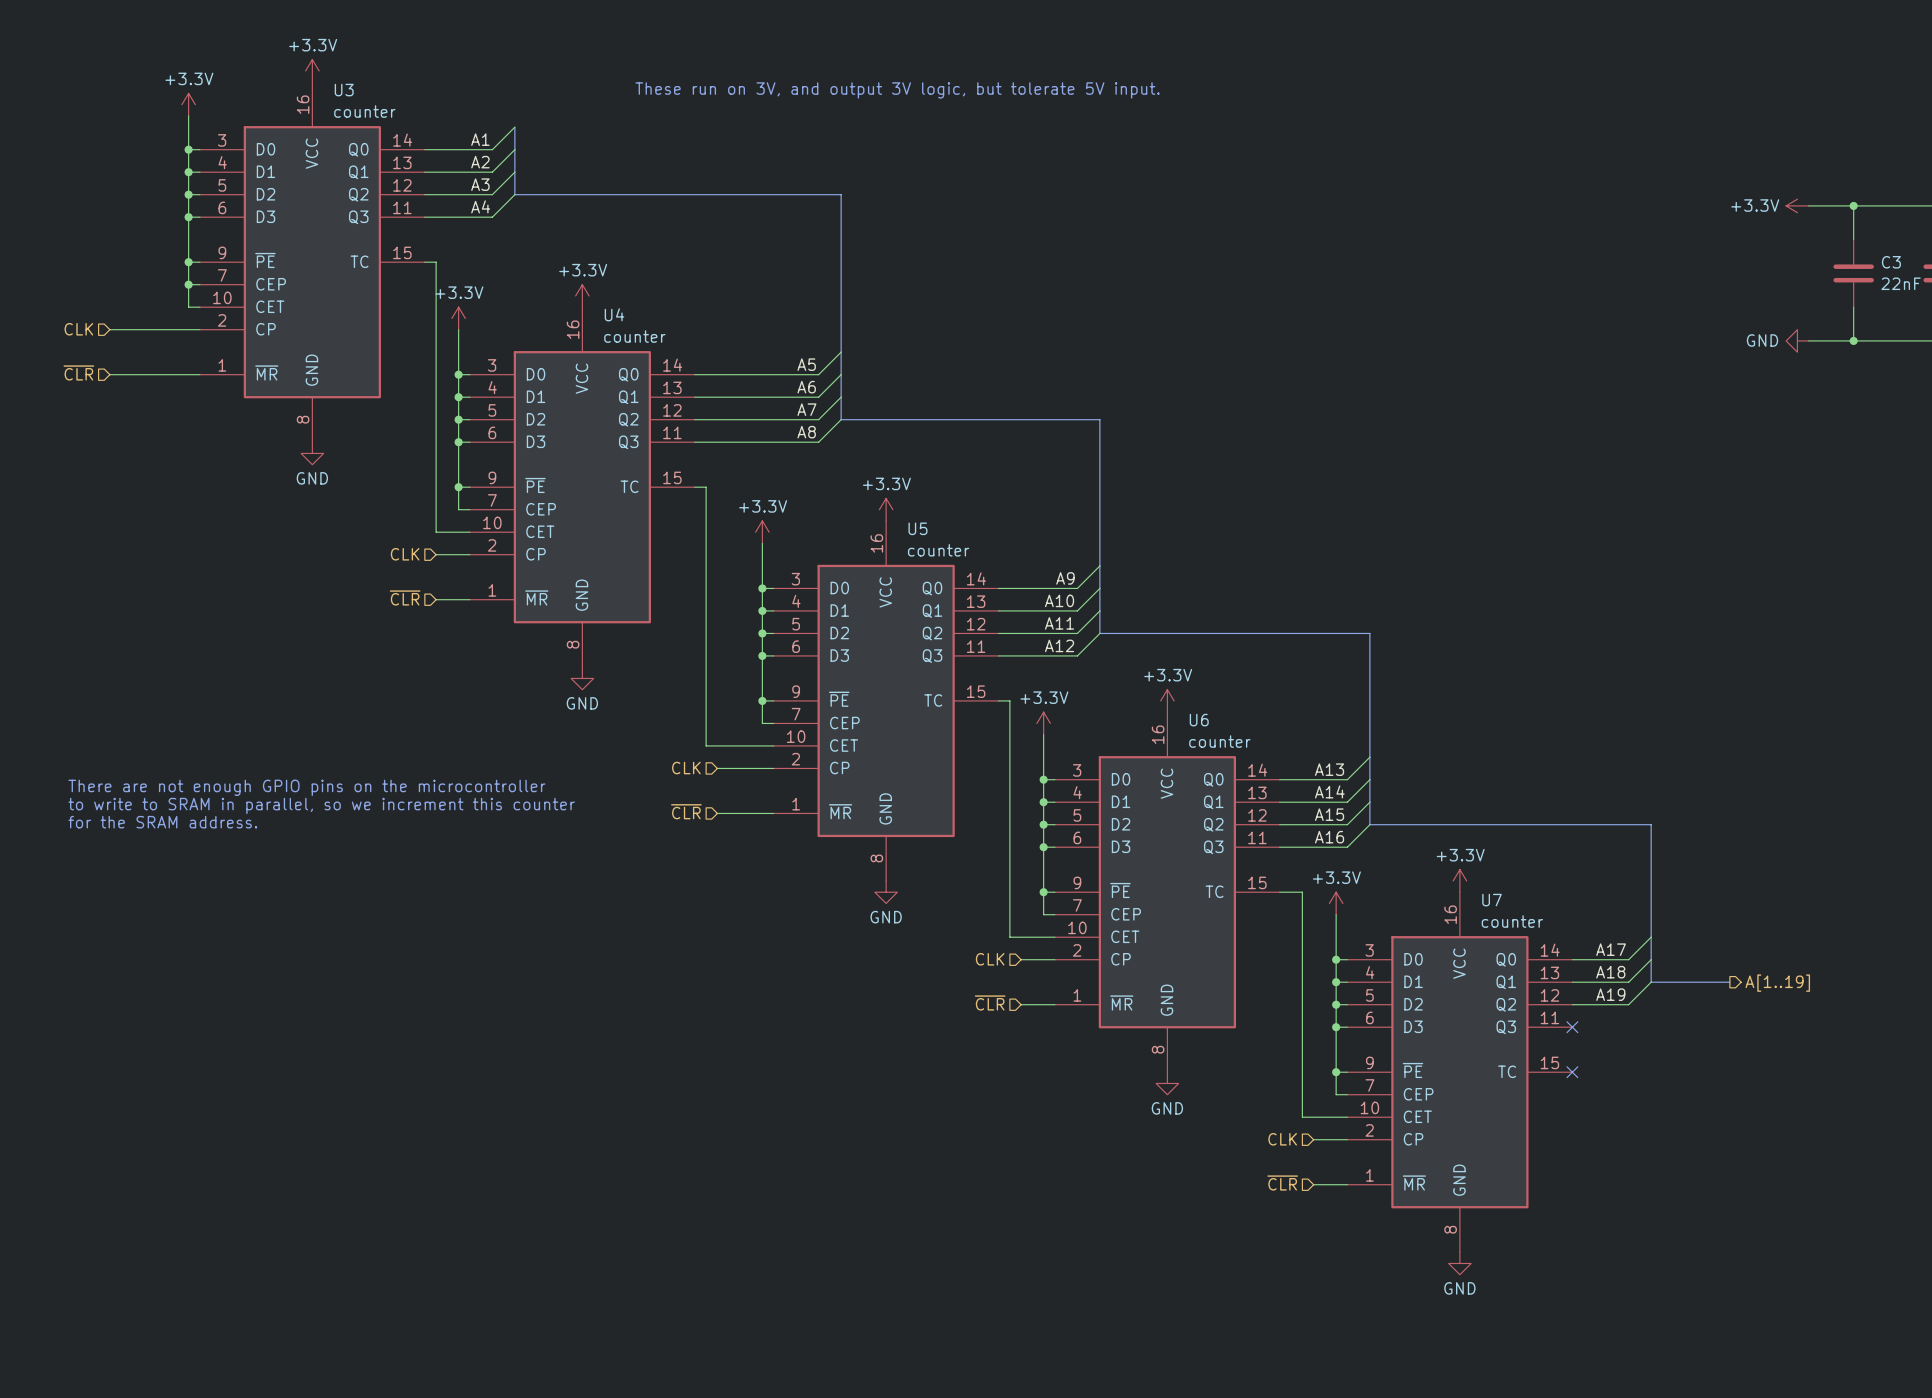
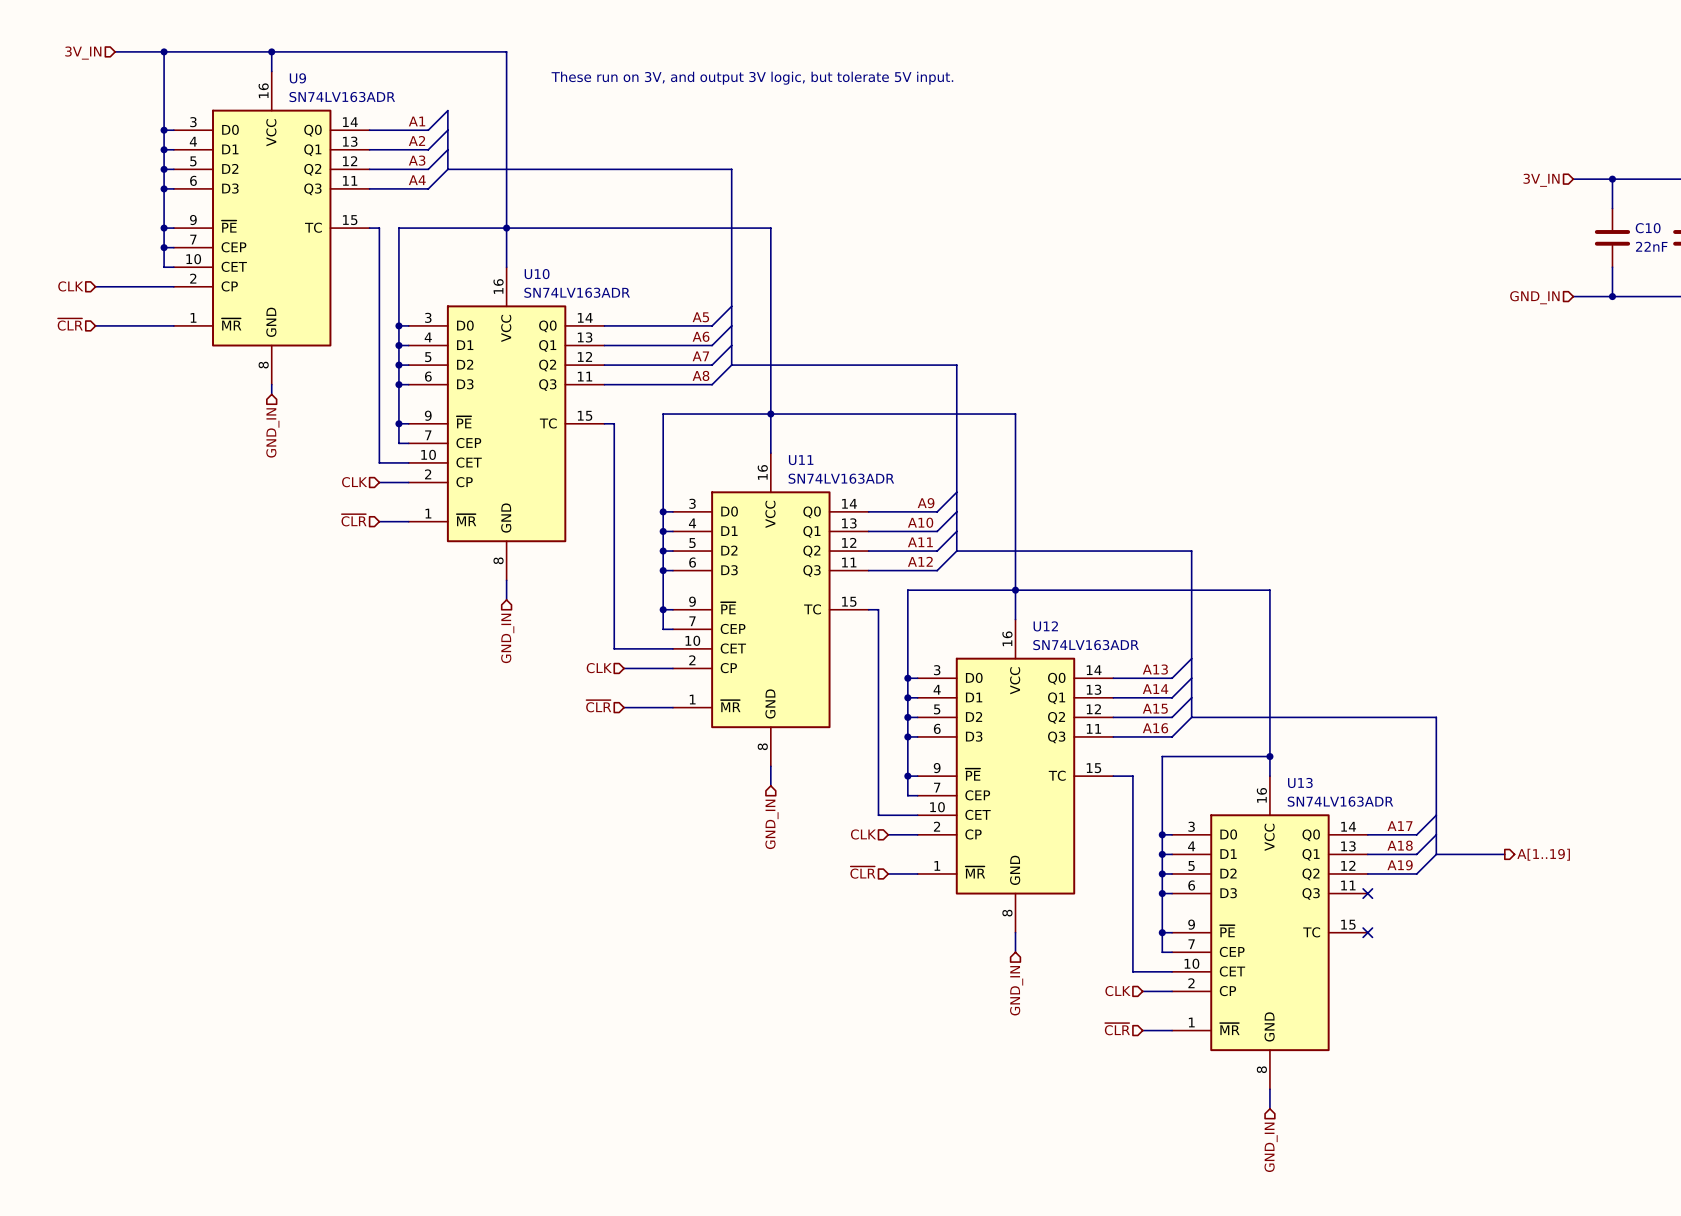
hierarchical label: none -> 3V_IN (83, 53)
wire: none -> (115, 51) (506, 51) (506, 267)
wire: none -> (164, 51) (164, 100)
junction: none -> (164, 51)
junction: none -> (271, 51)
power symbol: +3.3V (312, 70) -> none
U3 name: U3 (344, 90) -> U9 (297, 78)
power symbol: +3.3V (188, 104) -> none
U3 value: counter (364, 111) -> SN74LV163ADR (342, 97)
power symbol: +3.3V (1797, 205) -> none
hierarchical label: none -> 3V_IN (1541, 180)
junction: none -> (506, 228)
C3 name: C3 (1891, 262) -> C10 (1648, 228)
power symbol: +3.3V (582, 295) -> none
U4 name: U4 (614, 314) -> U10 (537, 274)
power symbol: +3.3V (458, 318) -> none
wire: none -> (398, 286) (398, 228) (770, 228) (770, 453)
U4 value: counter (634, 336) -> SN74LV163ADR (577, 292)
power symbol: GND (1797, 340) -> none
hierarchical label: none -> GND_IN (1534, 297)
power symbol: GND (312, 453) -> none
junction: none -> (770, 414)
hierarchical label: none -> GND_IN (272, 432)
power symbol: +3.3V (886, 509) -> none
U5 name: U5 (917, 528) -> U11 (801, 460)
power symbol: +3.3V (762, 532) -> none
wire: none -> (663, 472) (663, 414) (1015, 414) (1015, 619)
U5 value: counter (938, 550) -> SN74LV163ADR (841, 478)
power symbol: GND (582, 678) -> none
junction: none -> (1015, 590)
power symbol: +3.3V (1167, 700) -> none
U6 name: U6 (1199, 720) -> U12 (1045, 626)
power symbol: +3.3V (1043, 723) -> none
wire: none -> (907, 639) (907, 590) (1269, 590) (1269, 776)
hierarchical label: none -> GND_IN (507, 638)
U6 value: counter (1219, 741) -> SN74LV163ADR (1086, 645)
text: There are not enough GPIO pins on the microcontroller (306, 787) -> none
text: to write to SRAM in parallel, so we increment this counter (321, 805) -> none
text: for the SRAM address. (162, 822) -> none
wire: none -> (1269, 756) (1162, 756) (1162, 795)
junction: none -> (1269, 756)
power symbol: +3.3V (1459, 880) -> none
power symbol: GND (886, 892) -> none
U7 name: U7 (1492, 900) -> U13 (1300, 782)
power symbol: +3.3V (1336, 903) -> none
U7 value: counter (1512, 921) -> SN74LV163ADR (1340, 801)
hierarchical label: none -> GND_IN (771, 824)
power symbol: GND (1167, 1083) -> none
hierarchical label: none -> GND_IN (1016, 990)
power symbol: GND (1459, 1263) -> none
hierarchical label: none -> GND_IN (1271, 1147)

